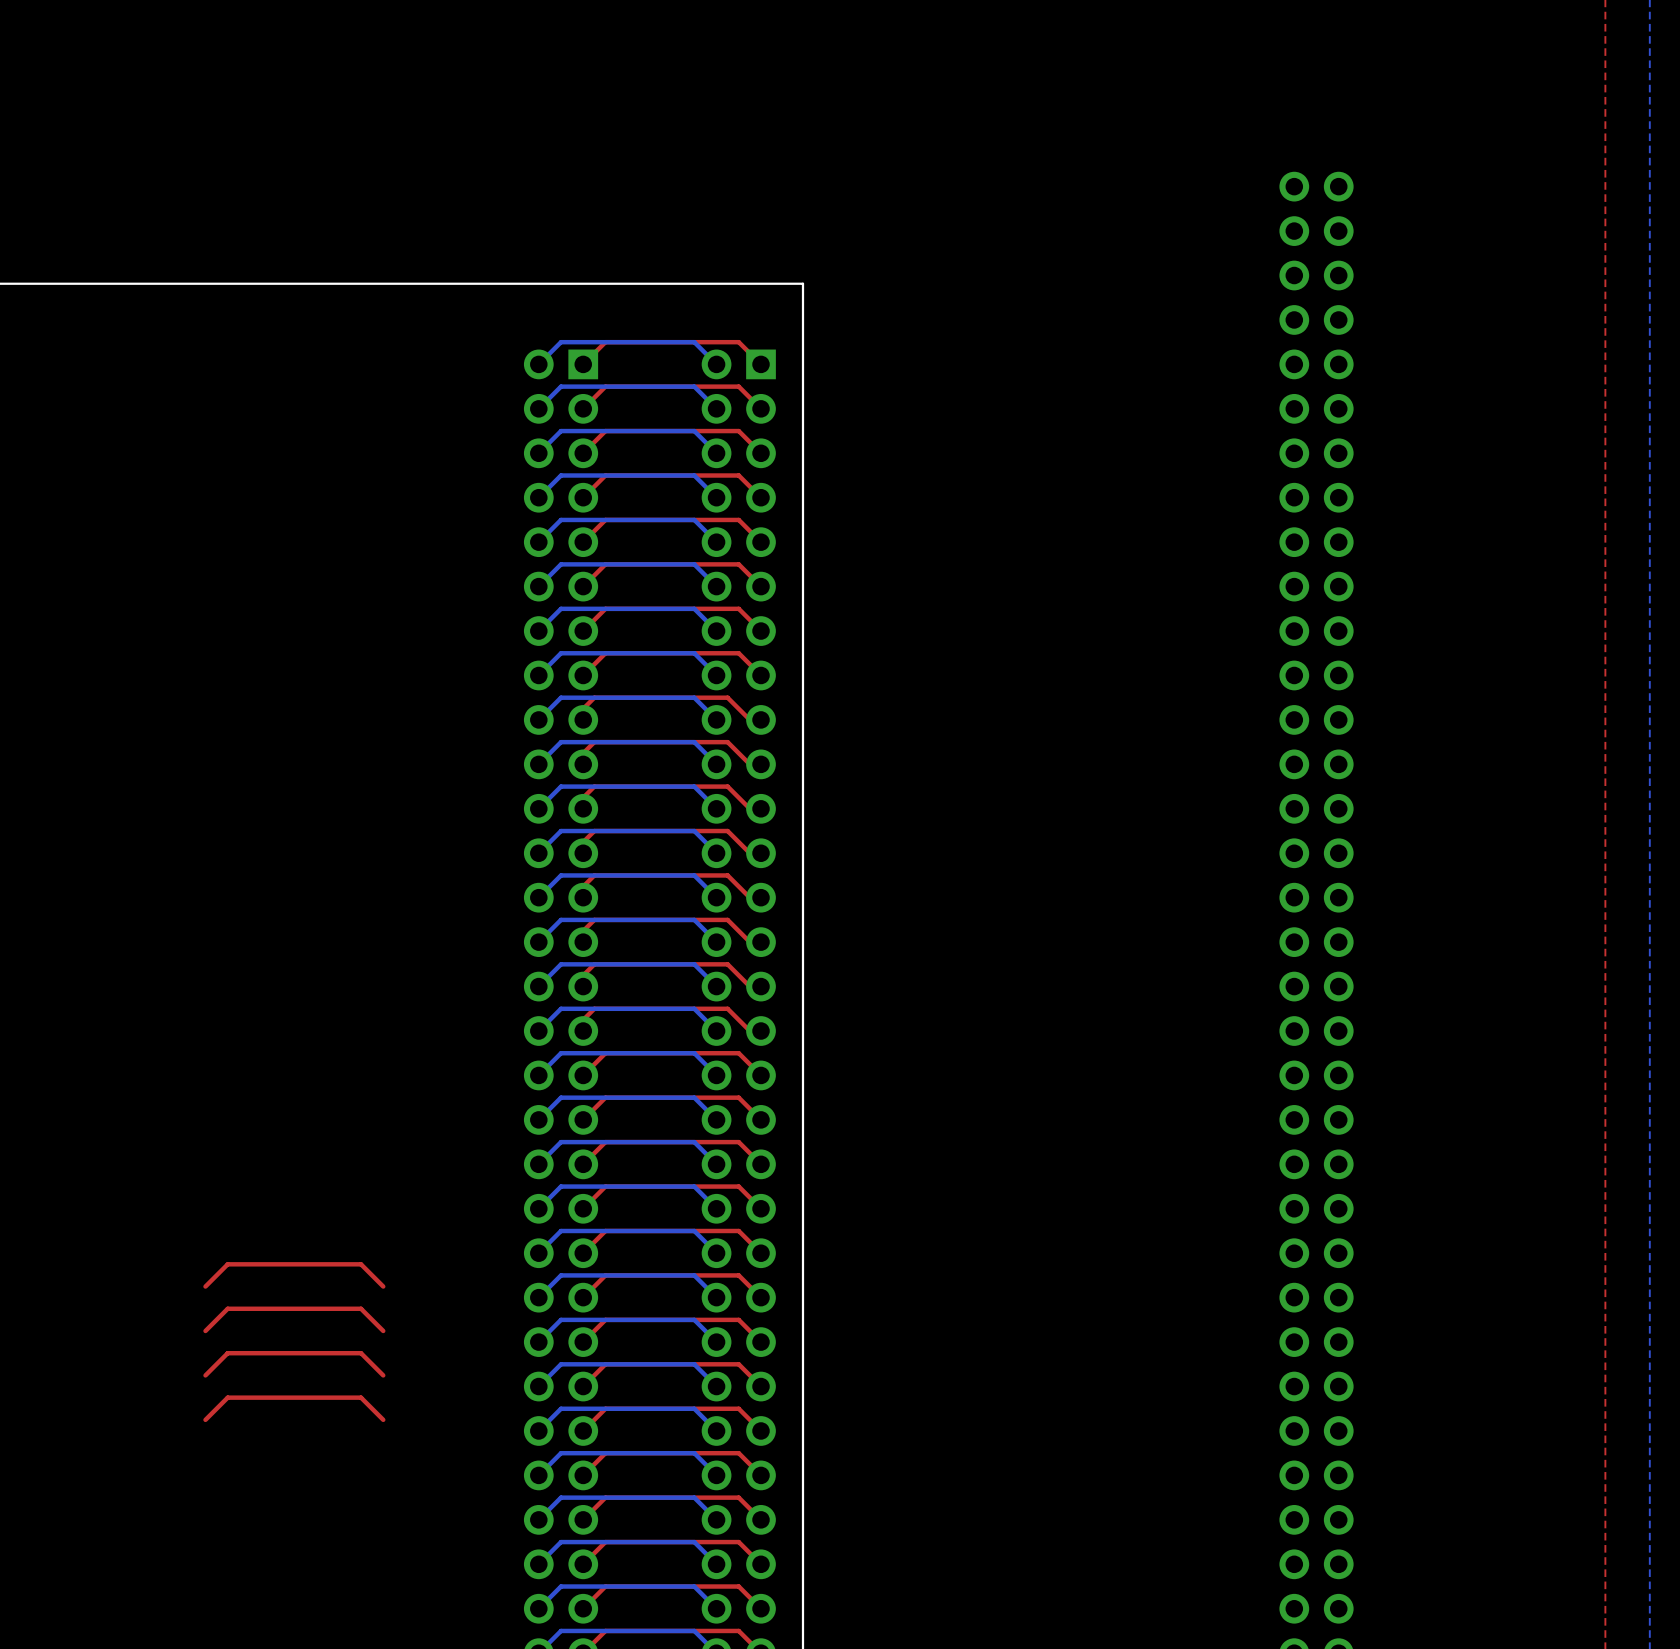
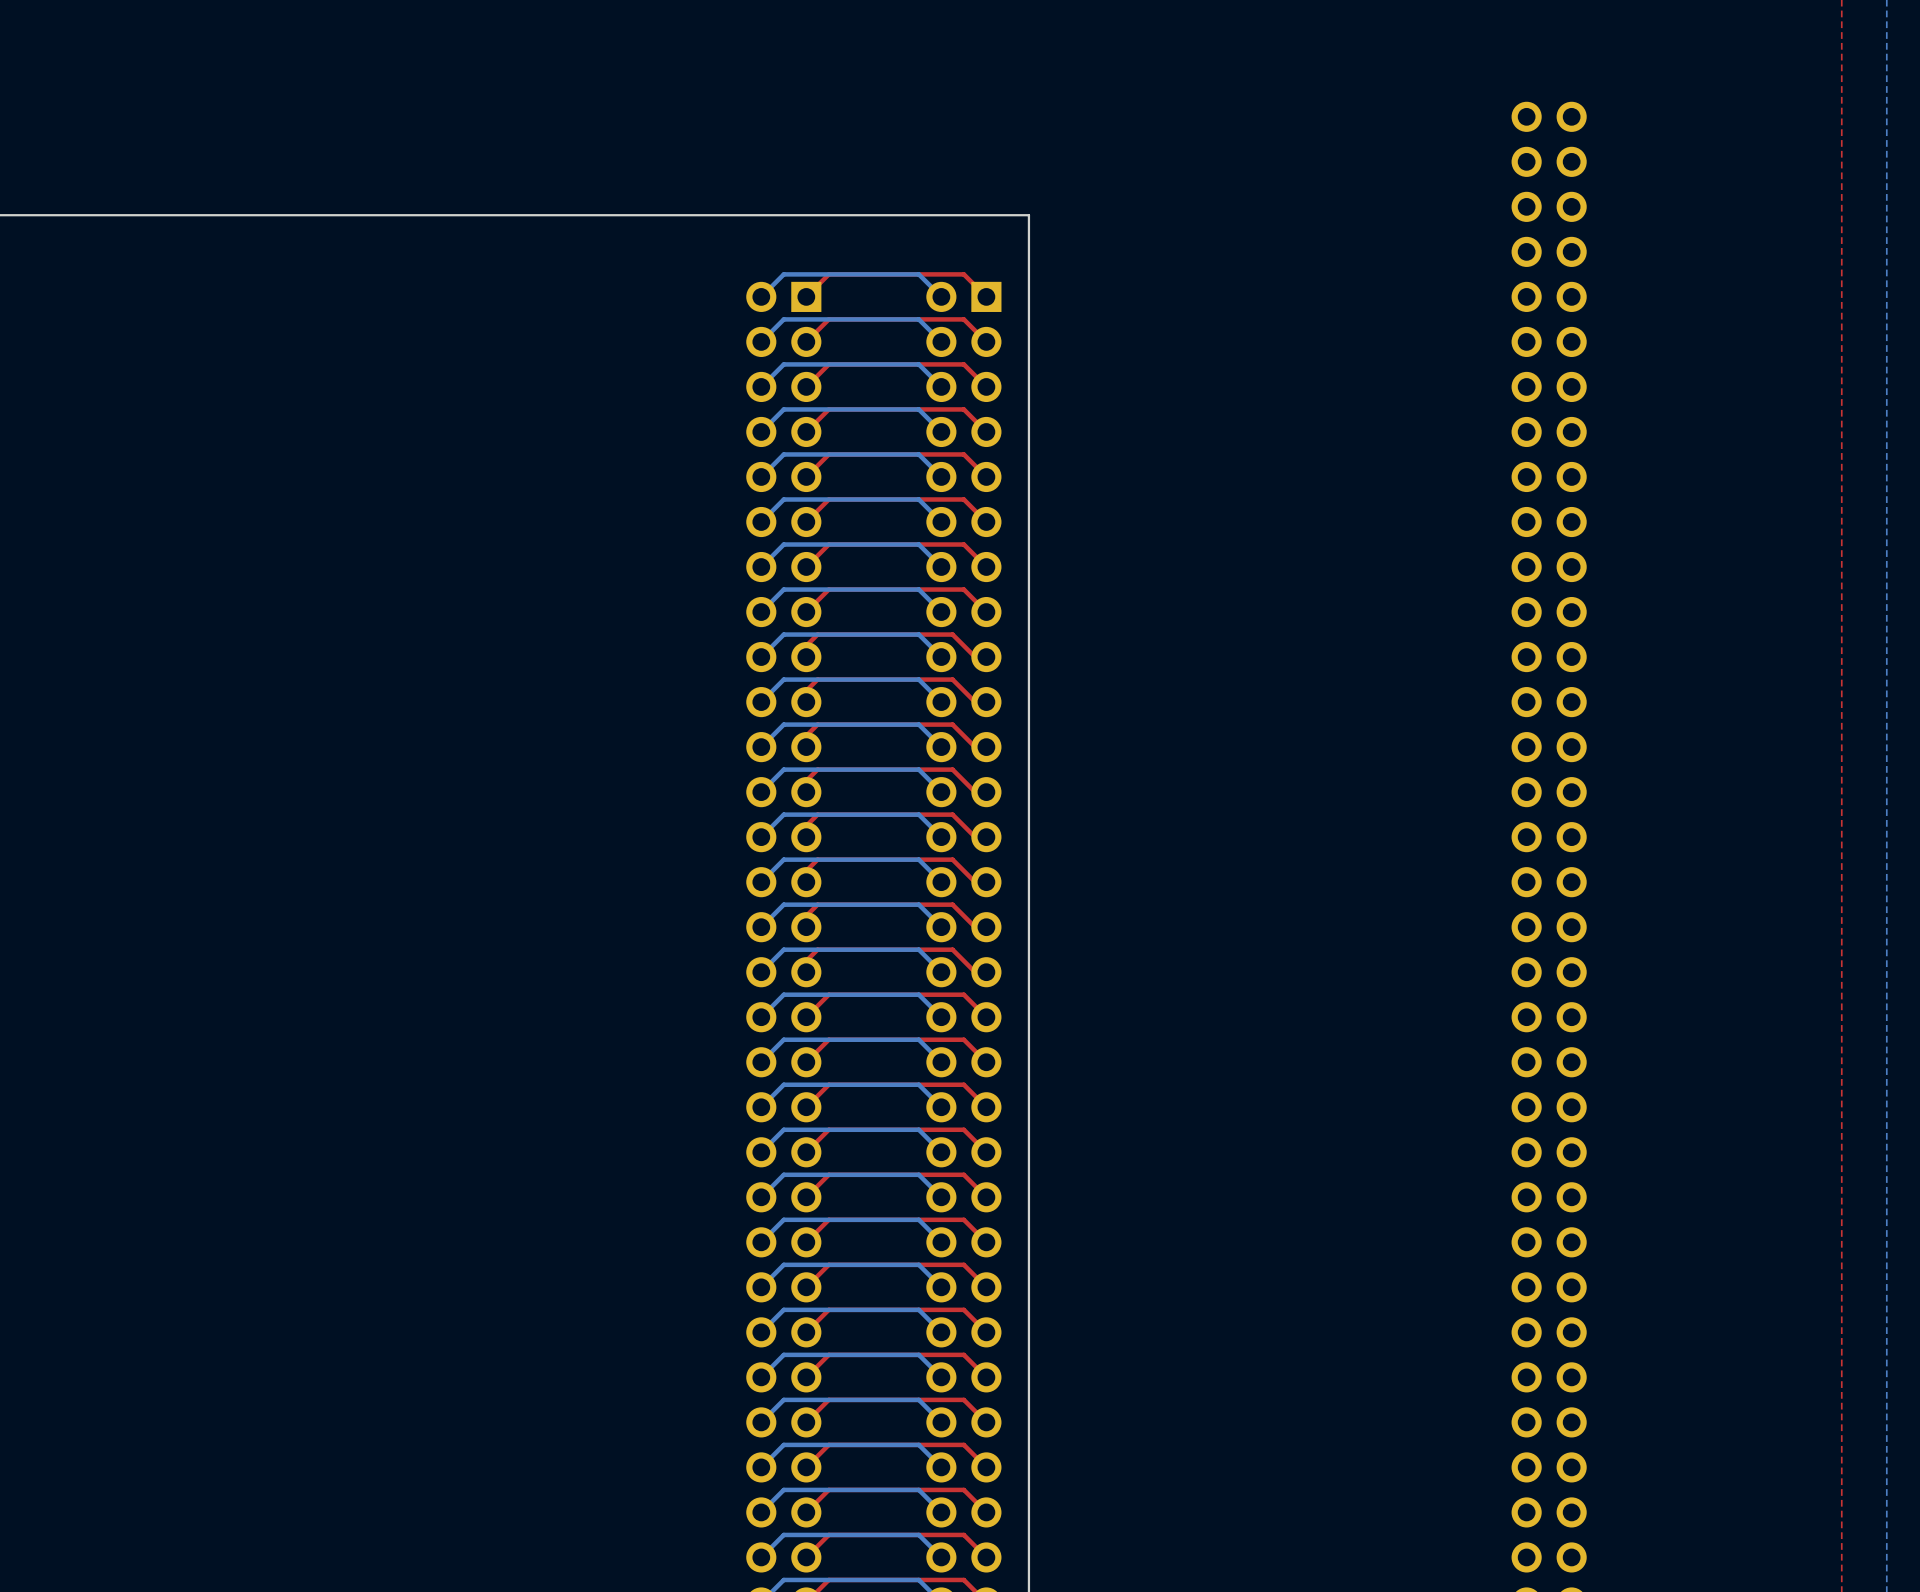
top track: (383, 1286) (361, 1264) (227, 1264) (205, 1286) -> none
top track: (383, 1330) (361, 1308) (227, 1308) (205, 1330) -> none
top track: (383, 1375) (361, 1353) (227, 1353) (205, 1375) -> none
top track: (383, 1419) (361, 1397) (227, 1397) (205, 1419) -> none

